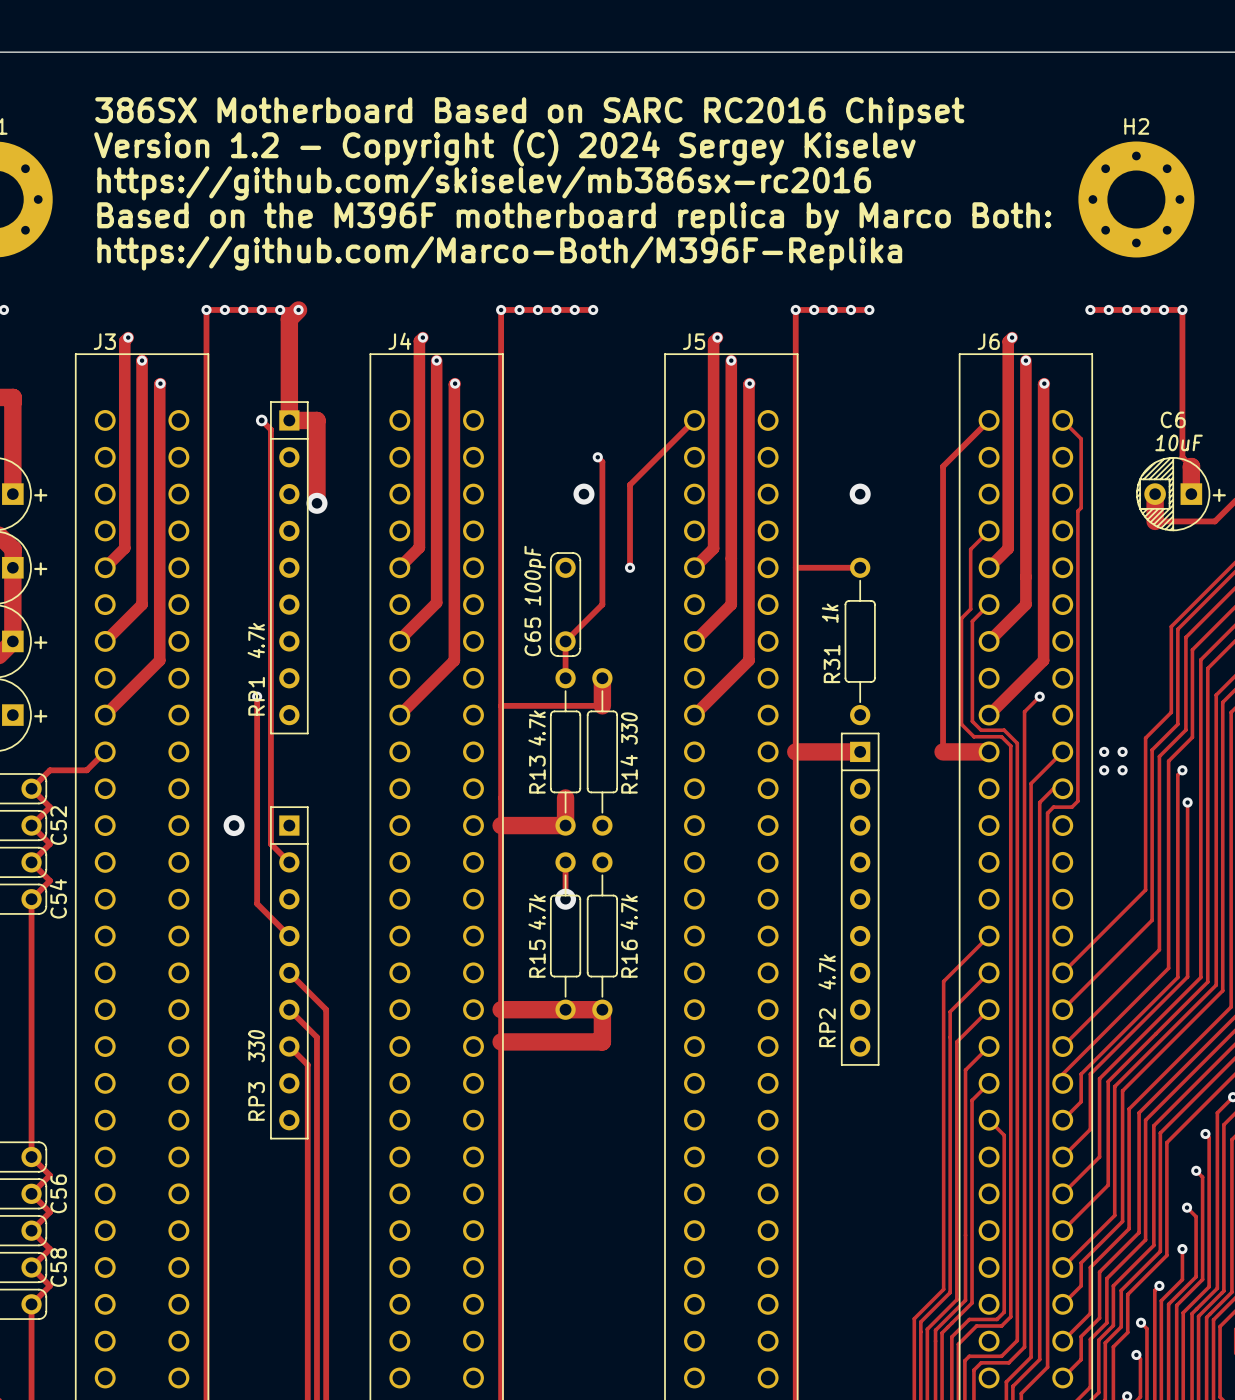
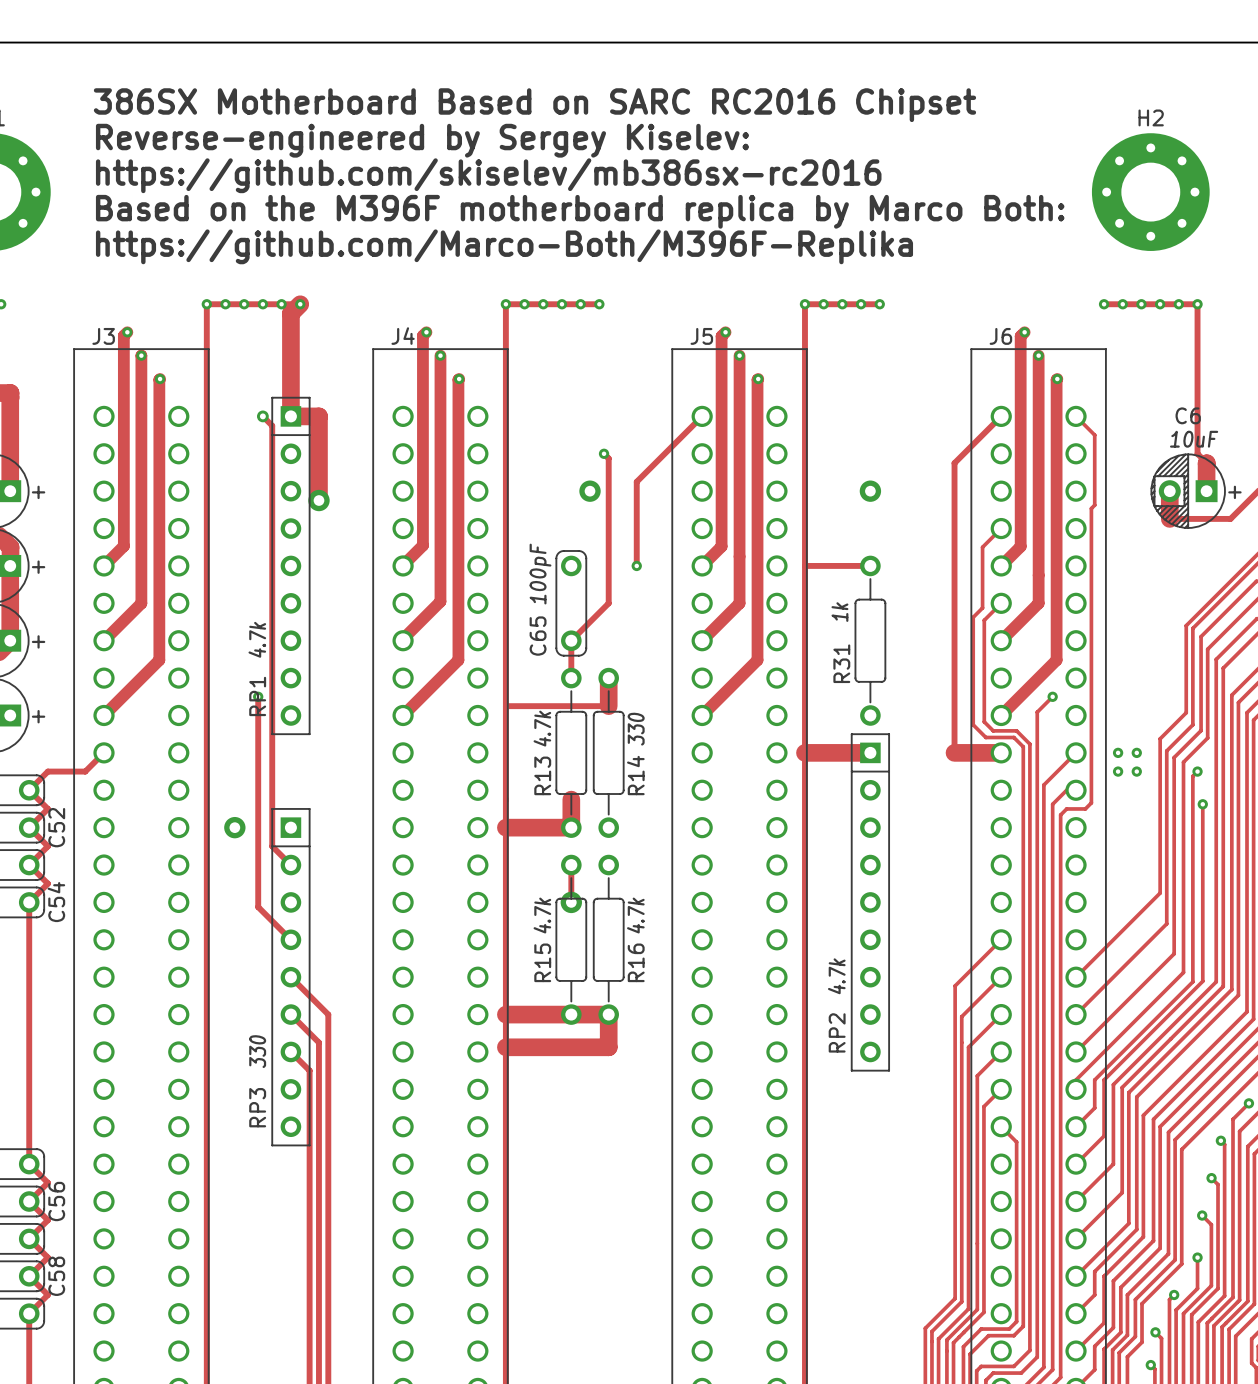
text: Version 1.2 - Copyright (C) 2024 Sergey Kiselev (504, 147) -> Reverse-engineered by Sergey Kiselev: (422, 140)

